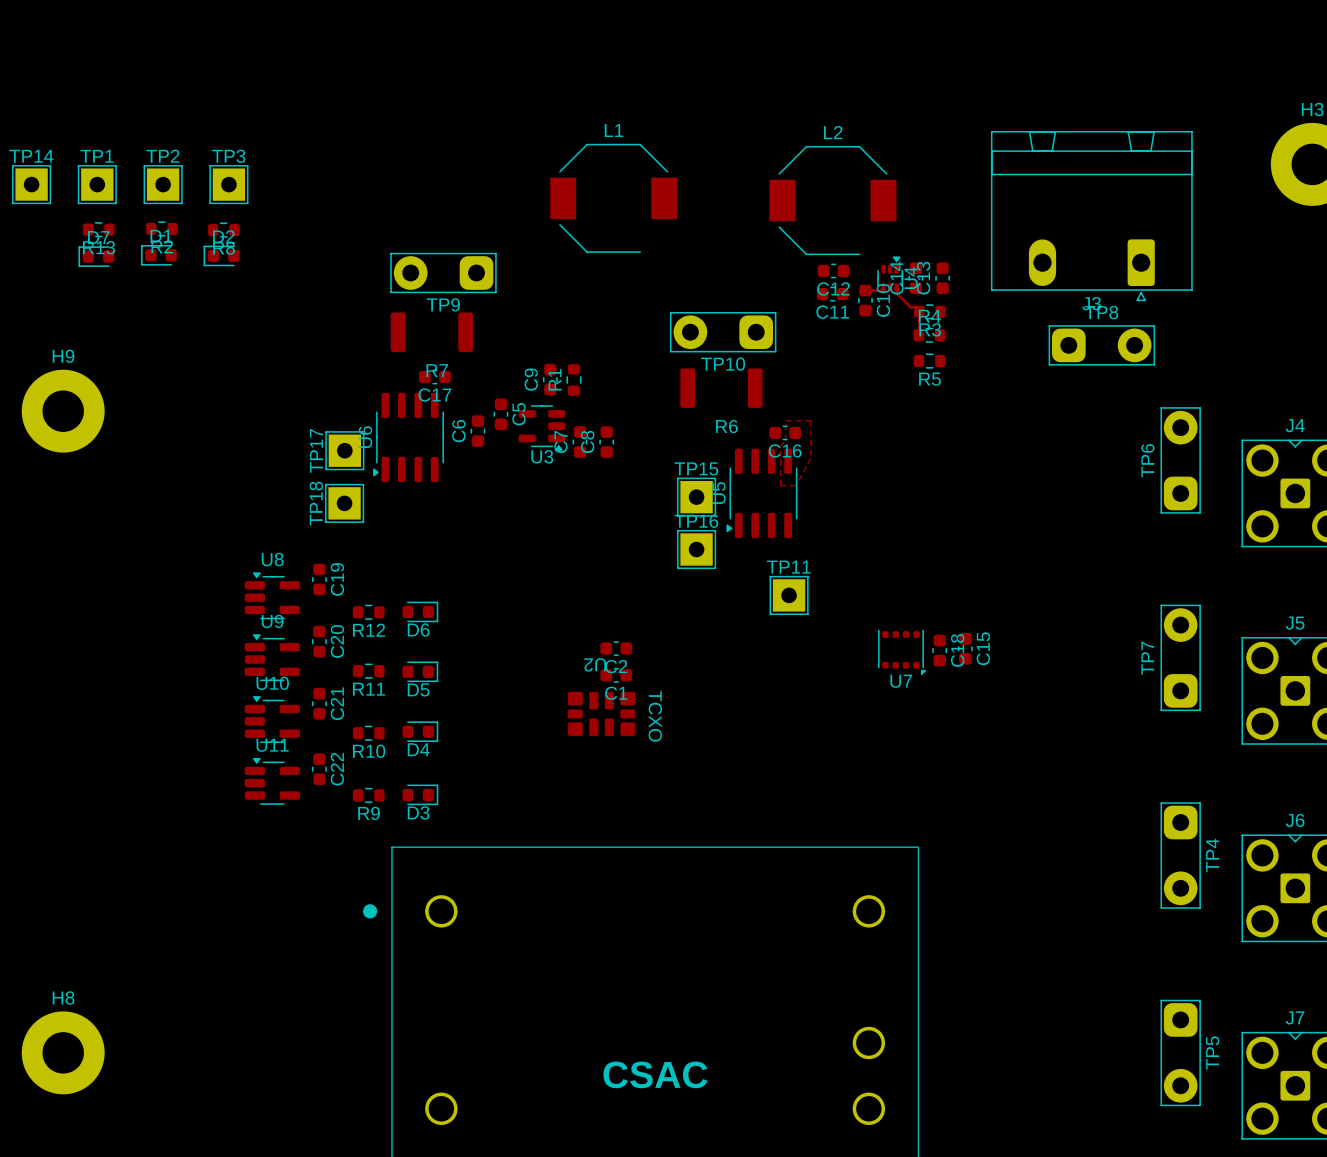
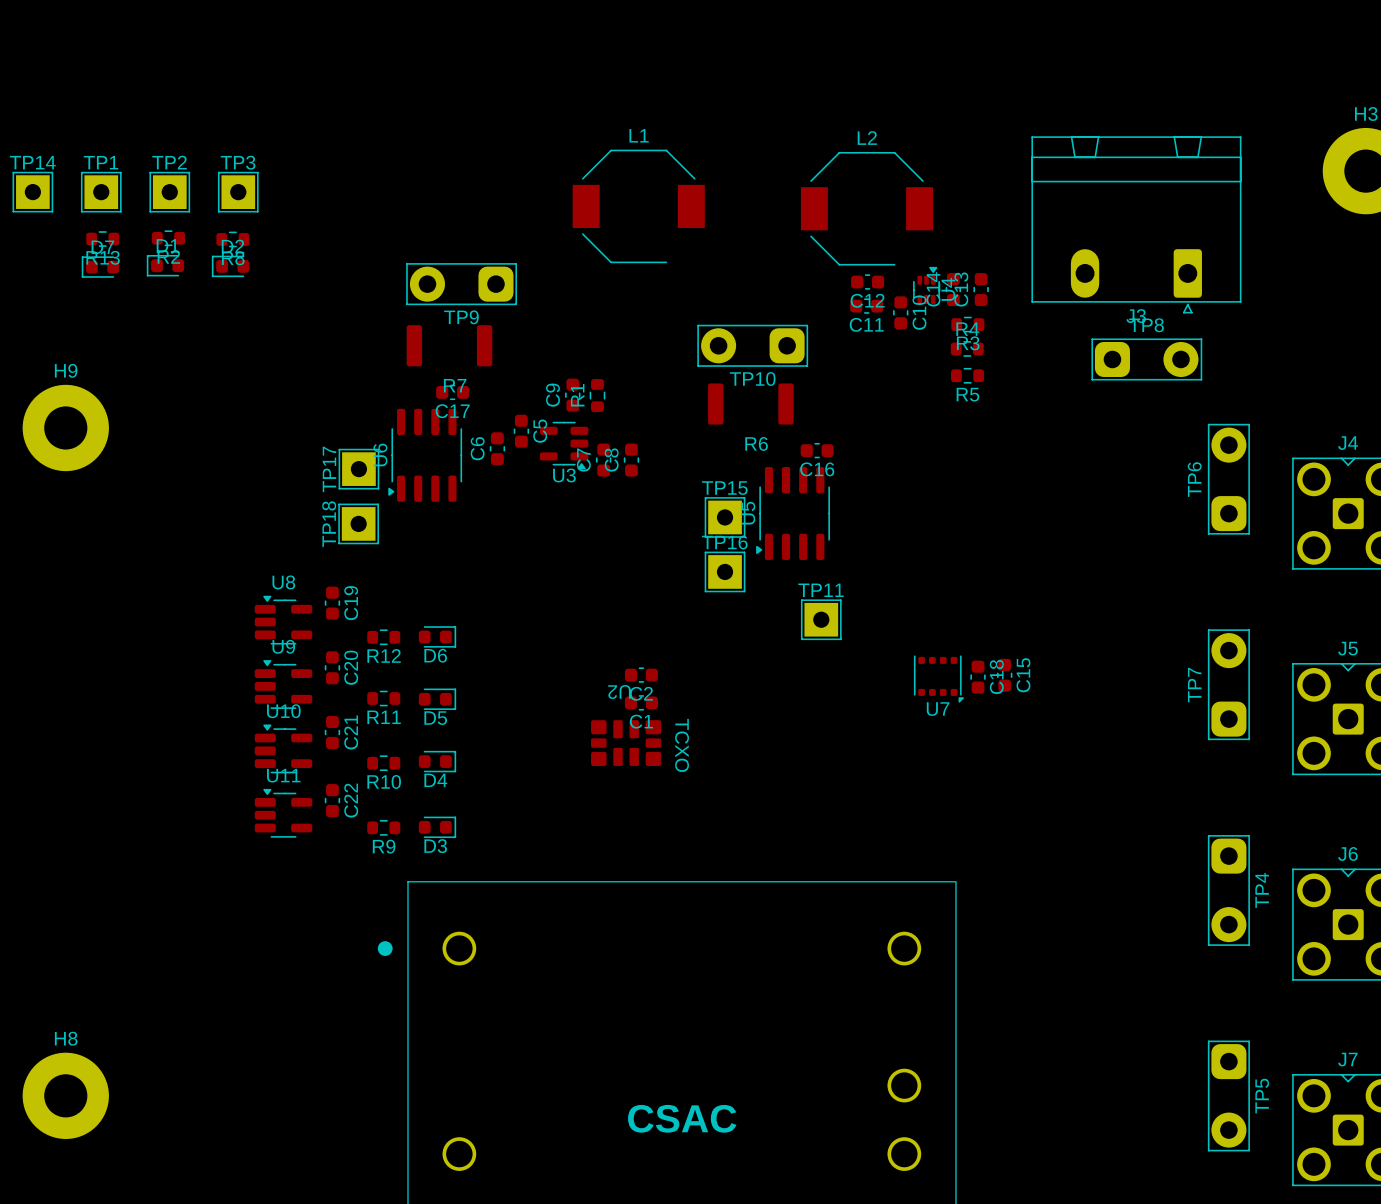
track: (883, 287) (880, 290) (865, 290) -> none
track: (896, 287) (896, 293) (910, 307) (914, 307) (919, 311) (918, 335) -> none
zone outline: (785, 420) (810, 420) (810, 458) (796, 485) (780, 485) (780, 446) (785, 439) (785, 420) -> none

